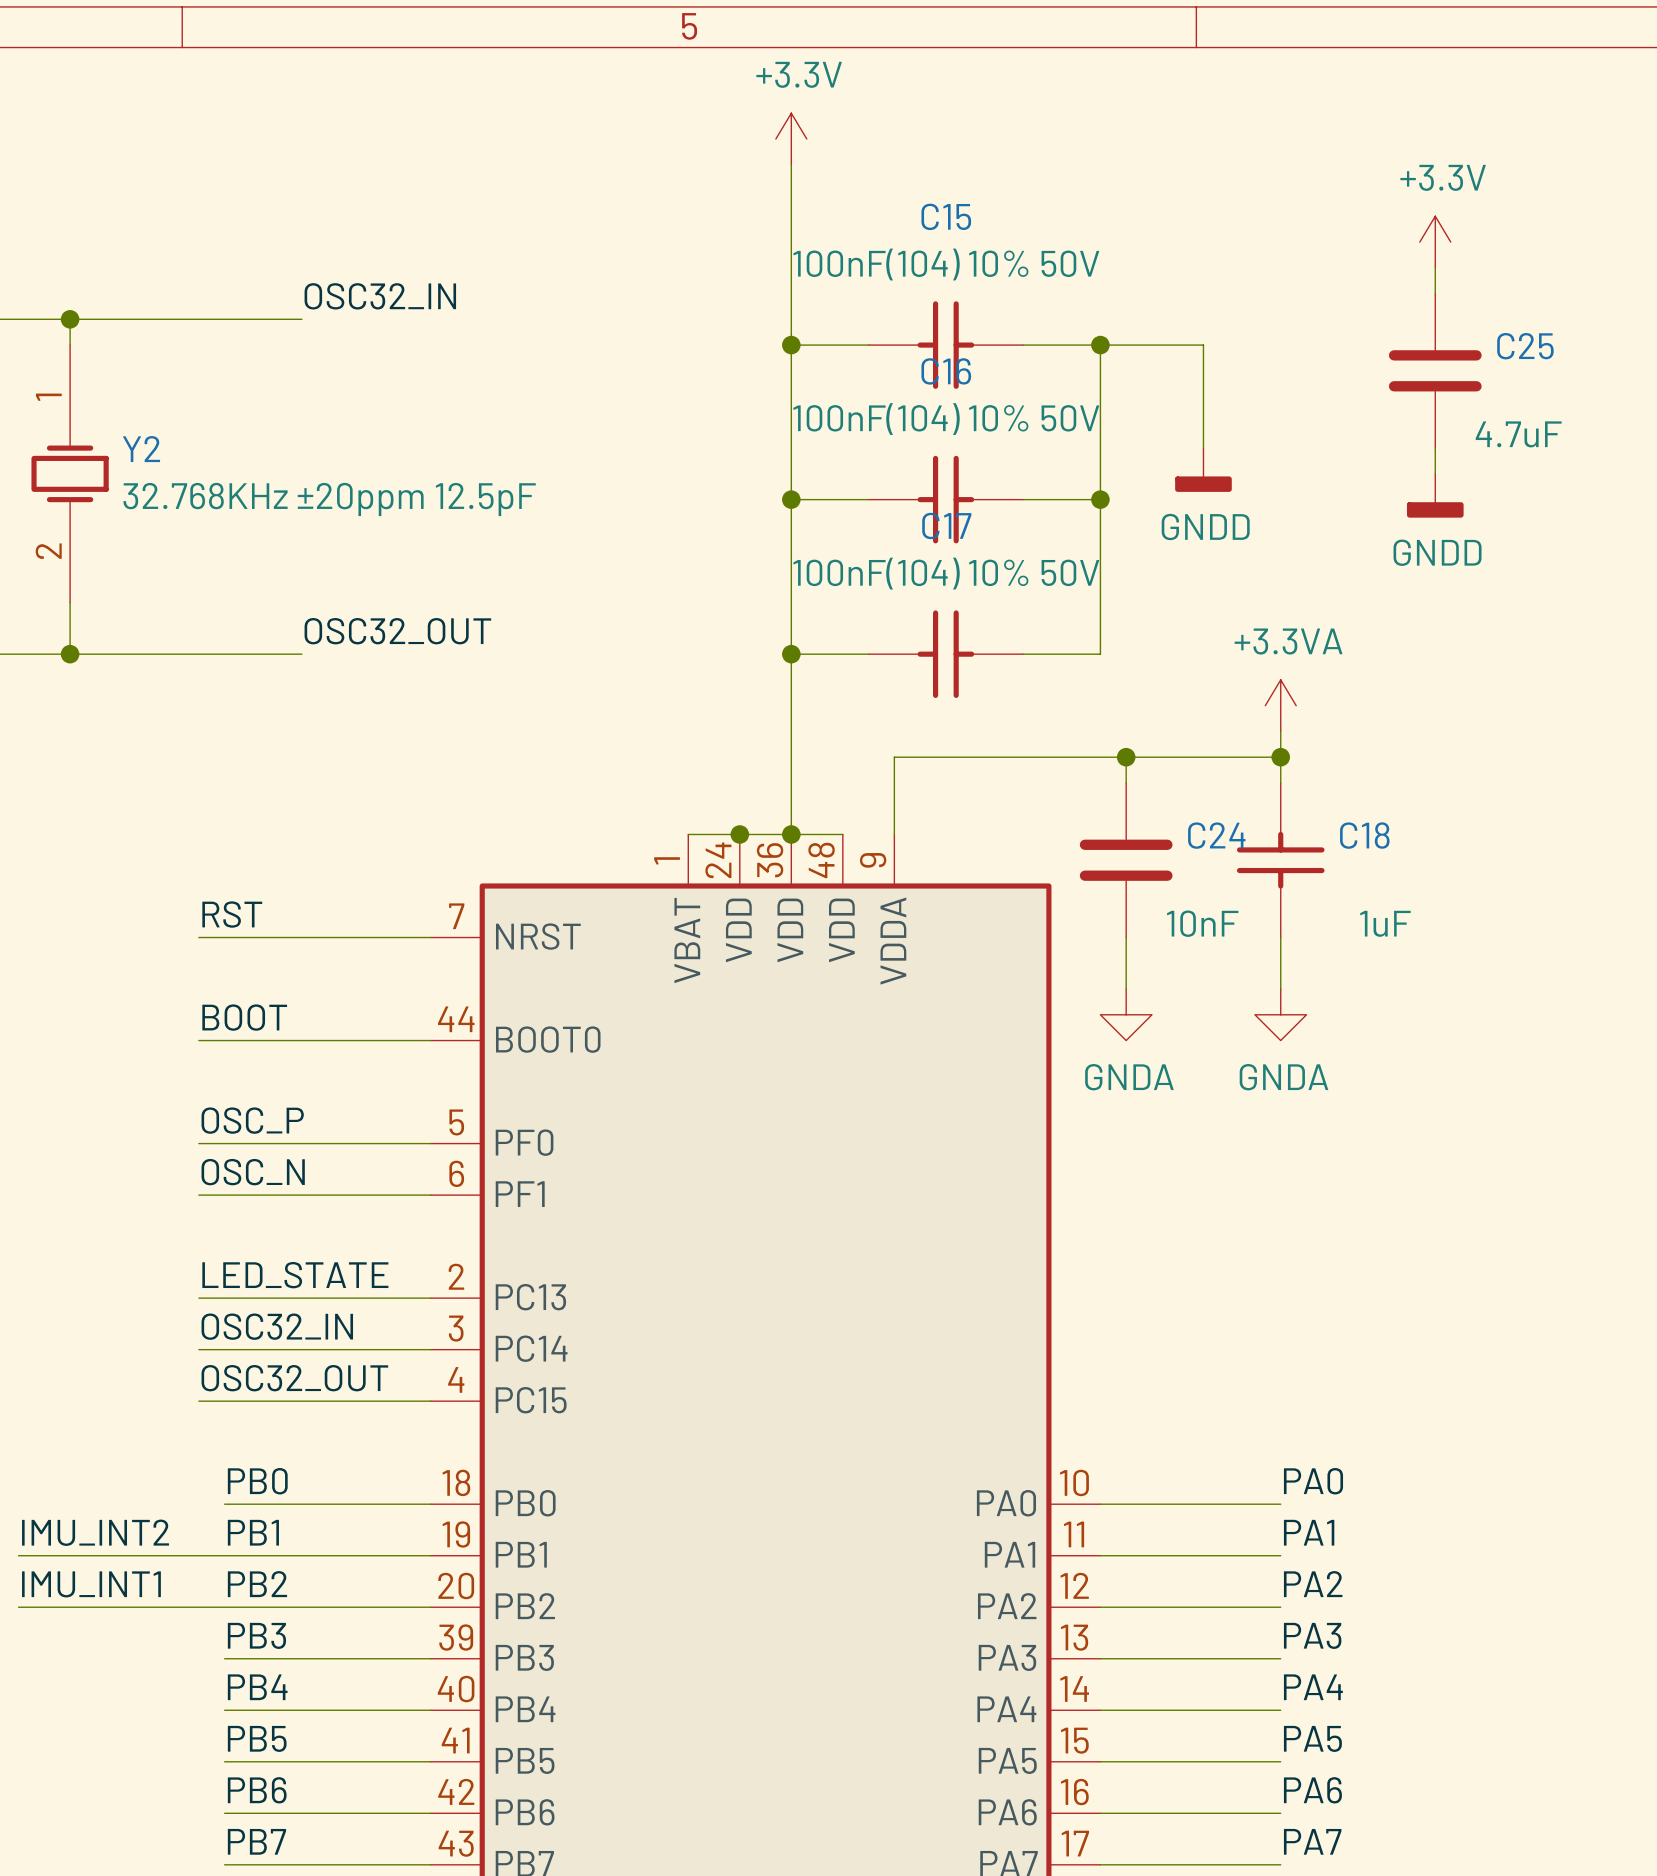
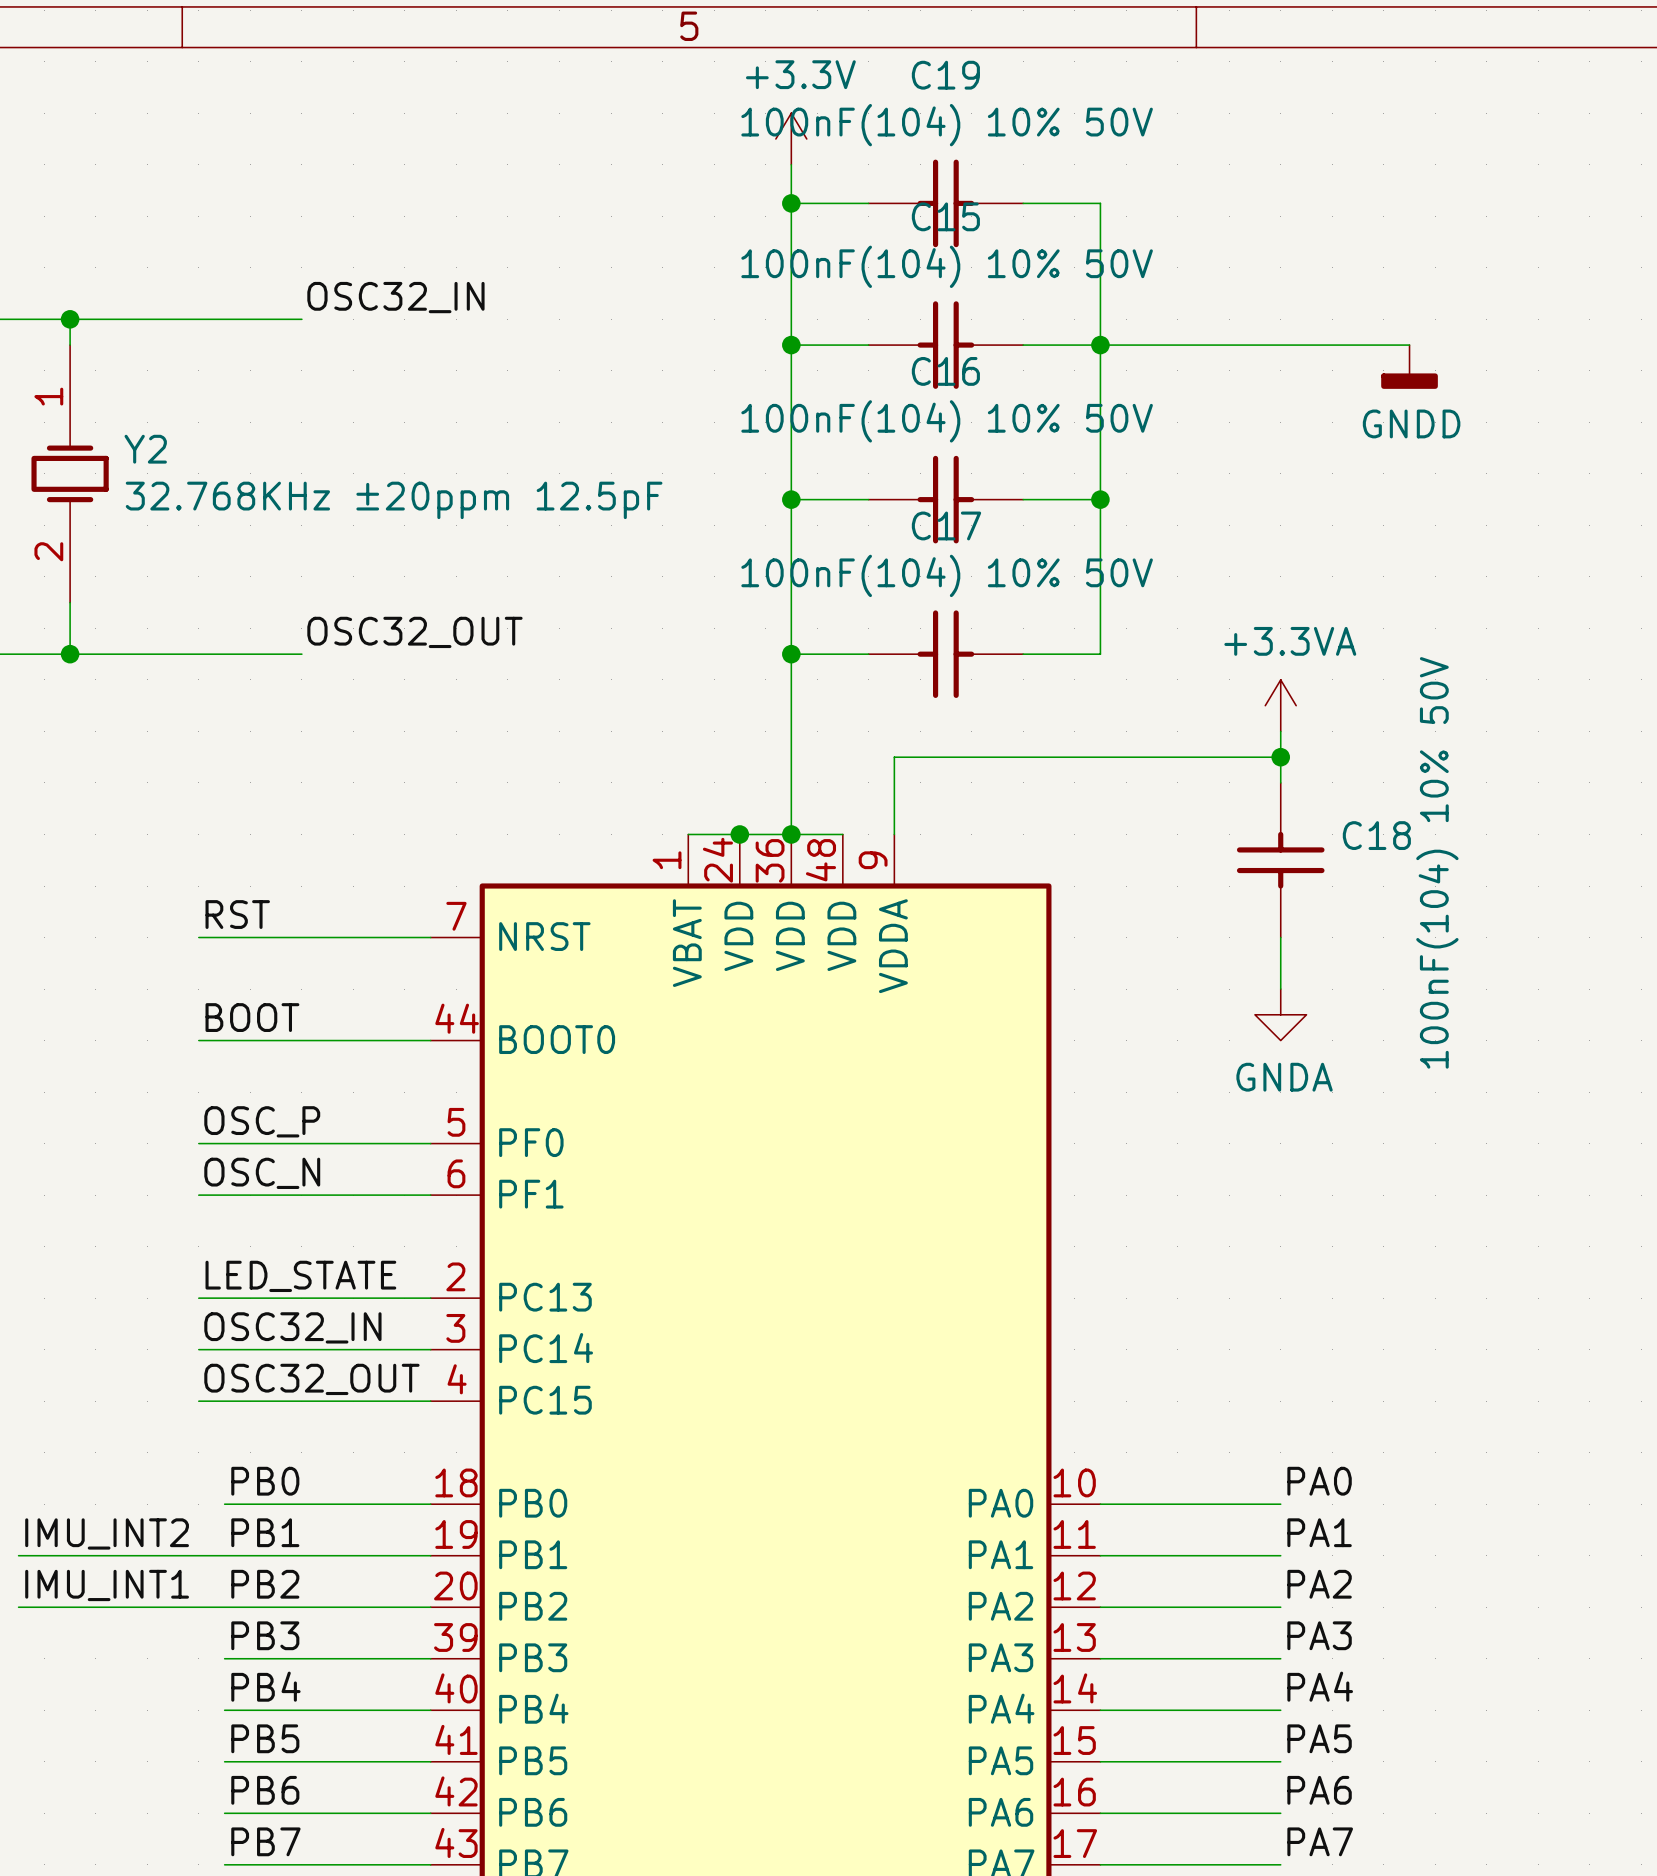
wire: none -> (791, 203) (868, 203)
junction: none -> (791, 203)
C19: none -> (945, 203)
wire: none -> (1023, 203) (1100, 203) (1100, 345)
power symbol: +3.3V (1435, 242) -> none
wire: (1435, 267) (1435, 293) -> none
wire: (1203, 345) (1203, 448) -> (1203, 345) (1409, 345)
power symbol: none -> GNDD (1409, 366)
C25: 4.7uF (1435, 370) -> none
wire: (1435, 448) (1435, 473) -> none
power symbol: GNDD (1203, 470) -> none
power symbol: GNDD (1435, 495) -> none
wire: (1126, 757) (1126, 782) -> none
junction: (1126, 757) -> none
C24: 10nF (1126, 860) -> none
C18 text: 1uF (1385, 923) -> 100nF(104) 10% 50V (1437, 862)
wire: (1126, 937) (1126, 989) -> none
power symbol: GNDA (1126, 1014) -> none

